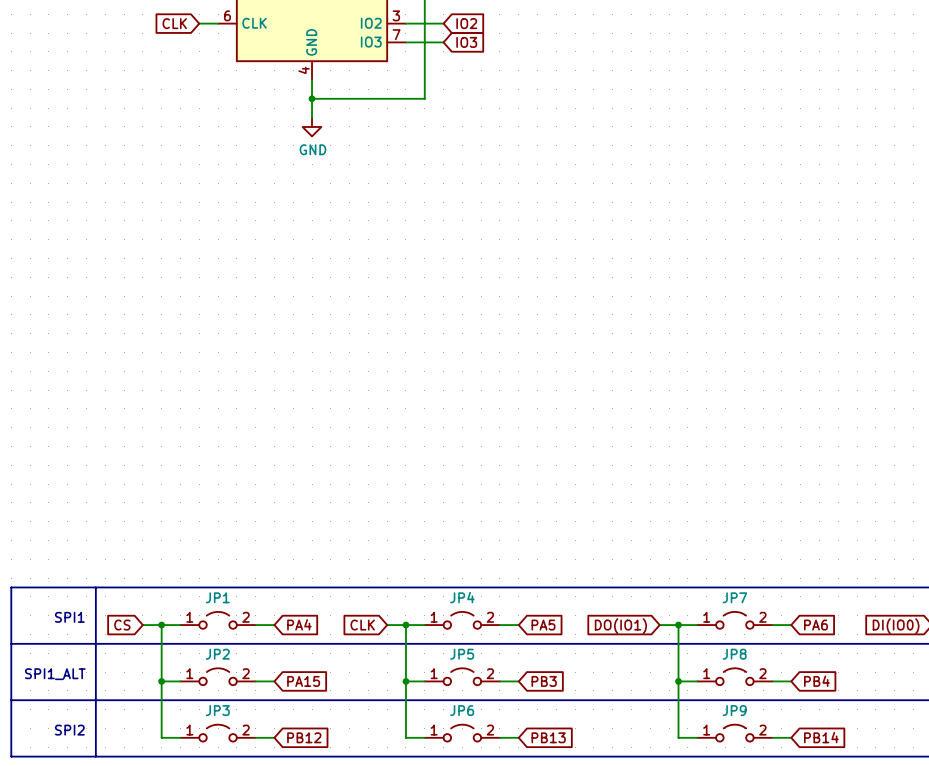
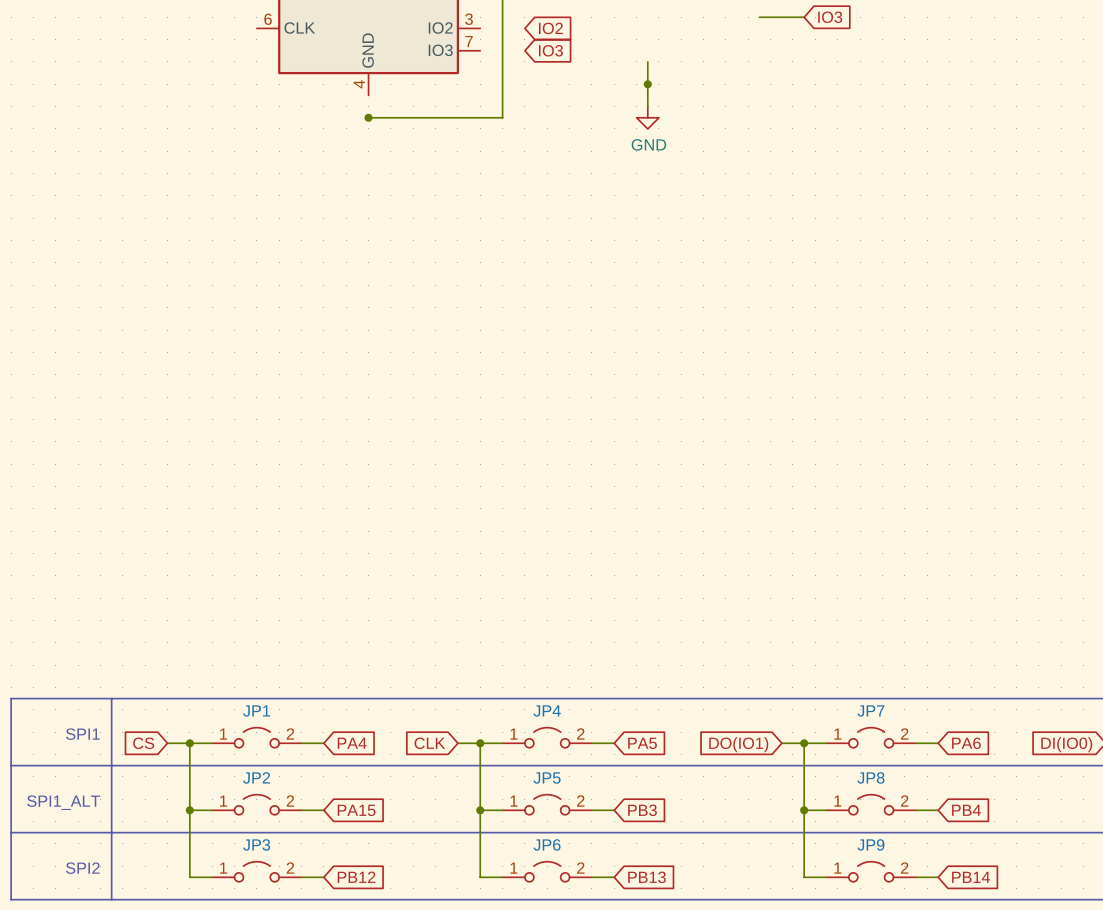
wire: none -> (759, 17) (804, 17)
global label: none -> IO3 (830, 17)
global label: CLK (174, 23) -> none
wire: (199, 23) (218, 23) -> none
wire: (405, 23) (443, 23) -> none
wire: (405, 42) (443, 42) -> none
wire: none -> (647, 61) (647, 106)
junction: none -> (647, 84)
wire: (312, 80) (312, 117) -> none
power symbol: none -> GND (647, 117)
power symbol: GND (312, 126) -> none

